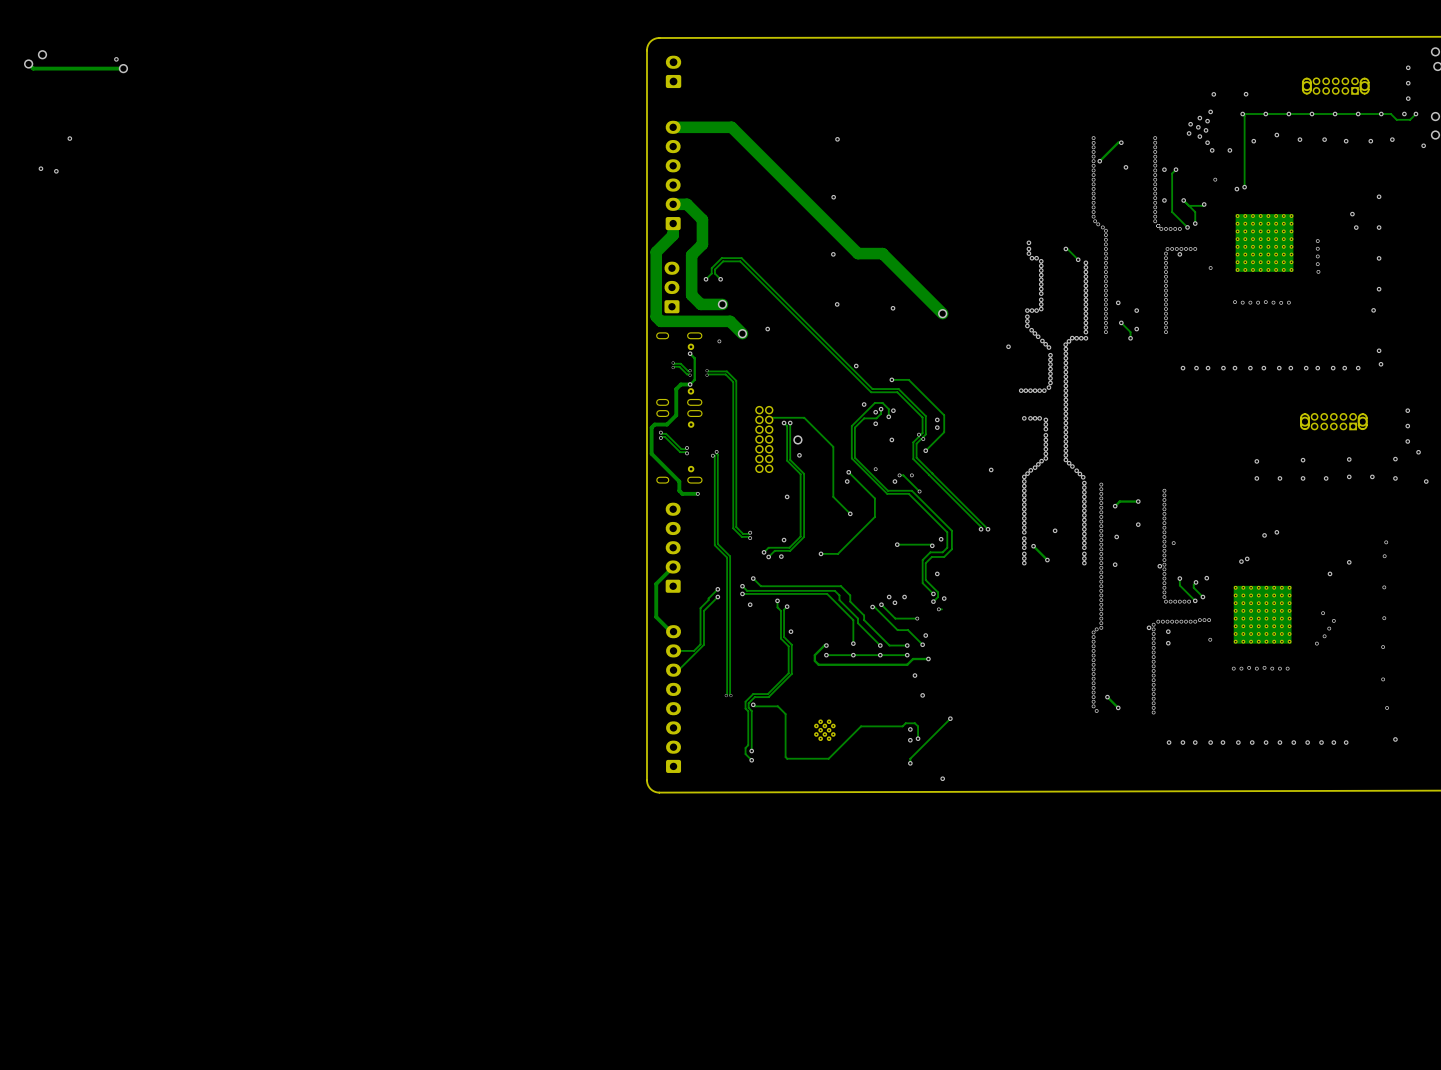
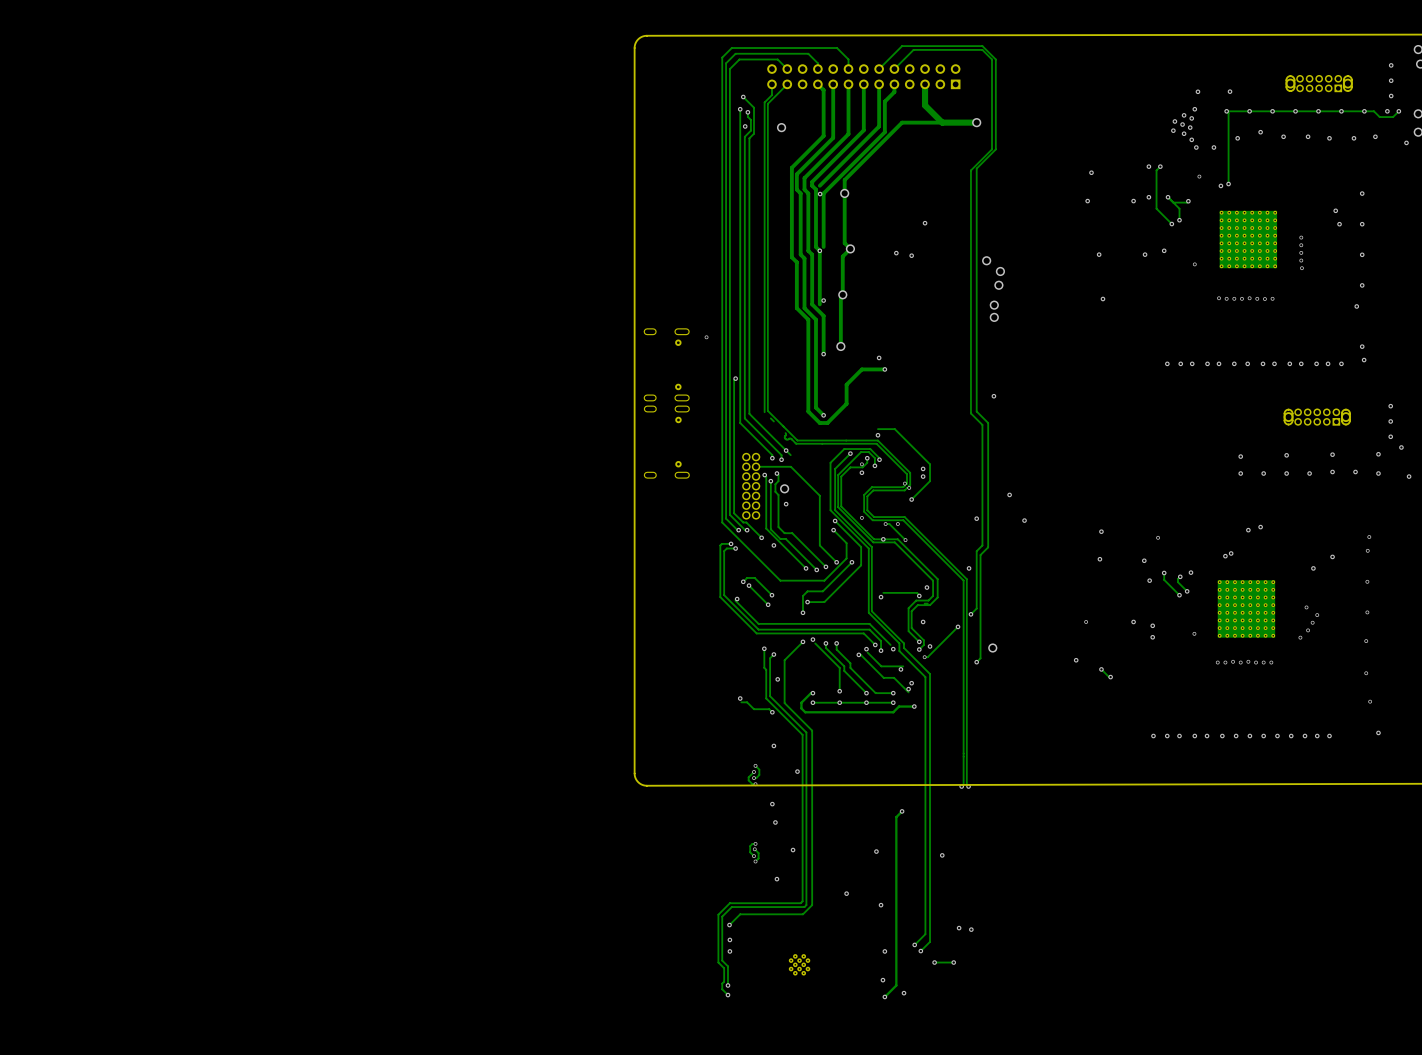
via: (42, 54) -> none
via: (116, 59) -> none
track: (28, 63) (33, 68) (123, 68) -> none
via: (28, 63) -> none
via: (123, 68) -> none
part: (673, 71) -> none
track: none -> (787, 69) (777, 59) (739, 59) (729, 69) (729, 514) (747, 530)
track: none -> (817, 69) (817, 63) (808, 53) (735, 53) (726, 63) (726, 518) (738, 530)
track: none -> (879, 69) (902, 46) (982, 46) (995, 59) (995, 149) (976, 168) (976, 411) (988, 423) (988, 547) (980, 555) (980, 658) (976, 662)
track: none -> (894, 69) (913, 49) (982, 49) (992, 59) (992, 149) (970, 170) (970, 413) (982, 424) (982, 545) (976, 551) (976, 608) (970, 614)
part: none -> (863, 76)
track: none -> (771, 84) (771, 95) (764, 102) (764, 412)
track: none -> (787, 84) (767, 103) (767, 410) (797, 440) (877, 440) (910, 472) (910, 484) (904, 490) (873, 490) (867, 496) (867, 510) (874, 517) (904, 517) (966, 579) (966, 784)
track: none -> (817, 84) (823, 90) (823, 136) (791, 167) (791, 257) (796, 262) (796, 308) (808, 319) (808, 411) (819, 423) (827, 423) (846, 403) (846, 384) (861, 369) (884, 369)
track: none -> (833, 84) (833, 137) (796, 174) (796, 189) (800, 193) (800, 254) (804, 258) (804, 308) (815, 319) (815, 407) (823, 415)
track: none -> (848, 84) (848, 134) (804, 178) (804, 189) (808, 193) (808, 250) (812, 254) (812, 304) (823, 315) (823, 354)
track: none -> (863, 84) (863, 130) (812, 181) (812, 185) (815, 189) (815, 246) (819, 250) (819, 304)
track: none -> (879, 84) (879, 126) (819, 185)
track: none -> (894, 84) (894, 92) (884, 101) (884, 132) (823, 193) (823, 246)
track: none -> (925, 84) (925, 105) (942, 122)
track: none -> (743, 96) (754, 107) (754, 133) (749, 138) (749, 413) (790, 455)
via: none -> (743, 96)
track: none -> (740, 109) (740, 423) (772, 455) (772, 458)
via: none -> (740, 109)
track: none -> (747, 112) (747, 116) (750, 119) (750, 130) (744, 136) (744, 418) (781, 455) (781, 459)
via: none -> (747, 112)
track: none -> (942, 122) (902, 122) (844, 180) (844, 243) (850, 248) (842, 256) (840, 346)
track: none -> (976, 122) (942, 122)
via: none -> (976, 122)
track: (673, 127) (731, 127) (857, 253) (882, 253) (942, 313) -> none
via: none -> (745, 126)
via: none -> (781, 127)
via: (69, 138) -> none
via: (1093, 138) -> none
via: (1155, 138) -> none
via: (837, 139) -> none
via: (1093, 142) -> none
track: (1121, 142) (1118, 142) (1099, 161) -> none
via: (1121, 142) -> none
via: (1155, 142) -> none
via: (1093, 147) -> none
via: (1155, 147) -> none
via: (1093, 151) -> none
via: (1155, 151) -> none
via: (1093, 156) -> none
via: (1155, 156) -> none
via: (1093, 161) -> none
via: (1099, 161) -> none
via: (1155, 161) -> none
via: (1093, 165) -> none
via: (1155, 165) -> none
via: (1125, 167) -> none
via: (40, 168) -> none
via: (1093, 170) -> none
via: (1155, 170) -> none
via: (56, 171) -> none
part: (673, 175) -> none
via: (1093, 175) -> none
via: none -> (1091, 172)
via: (1155, 175) -> none
via: (1093, 179) -> none
via: (1155, 179) -> none
via: (1093, 184) -> none
via: (1155, 184) -> none
via: (1093, 188) -> none
via: (1155, 188) -> none
via: (1093, 193) -> none
via: (1155, 193) -> none
via: none -> (844, 193)
via: (1093, 198) -> none
via: (1155, 198) -> none
via: (1093, 202) -> none
via: (1155, 202) -> none
track: (673, 204) (687, 204) (702, 219) (702, 244) (691, 255) (691, 295) (700, 304) (722, 304) -> none
via: none -> (1087, 201)
via: none -> (1133, 201)
via: (1093, 207) -> none
via: (1155, 207) -> none
via: (1093, 212) -> none
via: (1155, 212) -> none
via: (1093, 216) -> none
via: (1155, 216) -> none
via: (1095, 221) -> none
via: (1155, 221) -> none
track: (673, 223) (673, 235) (656, 252) (656, 316) (660, 321) (730, 321) (742, 333) -> none
via: (1098, 224) -> none
via: (1158, 225) -> none
via: none -> (925, 223)
via: (1102, 227) -> none
via: (1161, 228) -> none
via: (1165, 228) -> none
via: (1170, 228) -> none
via: (1175, 228) -> none
via: (1179, 228) -> none
via: (1105, 230) -> none
via: (1105, 235) -> none
via: (1105, 239) -> none
via: (1028, 242) -> none
via: (1105, 244) -> none
via: (1028, 248) -> none
track: (1065, 248) (1078, 259) -> none
via: (1065, 248) -> none
via: (1105, 248) -> none
via: (1167, 248) -> none
via: (1172, 248) -> none
via: (1176, 248) -> none
via: (1181, 248) -> none
via: (1186, 248) -> none
via: (1190, 248) -> none
via: (1195, 248) -> none
via: none -> (850, 248)
via: (1028, 253) -> none
via: (1105, 253) -> none
via: (1165, 253) -> none
via: none -> (896, 253)
via: (1032, 258) -> none
via: (1036, 258) -> none
via: (1106, 258) -> none
via: none -> (1099, 254)
via: none -> (1145, 254)
via: (1165, 258) -> none
via: none -> (911, 255)
via: (1078, 259) -> none
via: (1041, 261) -> none
via: (1085, 262) -> none
via: (1105, 262) -> none
via: (1165, 262) -> none
via: none -> (986, 260)
via: (1041, 265) -> none
via: (1085, 267) -> none
via: (1105, 267) -> none
via: (1165, 267) -> none
via: (1041, 270) -> none
via: (1085, 272) -> none
via: (1105, 272) -> none
via: (1165, 272) -> none
via: none -> (1000, 271)
via: (1041, 275) -> none
via: (1085, 276) -> none
via: (1105, 276) -> none
via: (1165, 276) -> none
track: (706, 279) (711, 273) (711, 268) (721, 258) (741, 258) (872, 389) (898, 389) (925, 416) (925, 434) (916, 443) (916, 457) (932, 473) -> none
via: (706, 279) -> none
track: (720, 279) (714, 273) (714, 269) (723, 261) (740, 261) (871, 392) (897, 392) (922, 417) (922, 433) (913, 442) (913, 459) (929, 474) -> none
via: (720, 279) -> none
via: (1041, 279) -> none
via: (1085, 281) -> none
via: (1105, 281) -> none
via: (1165, 281) -> none
via: (1041, 284) -> none
via: (1085, 285) -> none
via: (1105, 285) -> none
via: (1165, 285) -> none
part: (671, 287) -> none
via: none -> (998, 285)
via: (1041, 289) -> none
via: (1085, 290) -> none
via: (1105, 290) -> none
via: (1165, 290) -> none
via: (1041, 293) -> none
via: (1085, 295) -> none
via: (1105, 295) -> none
via: (1165, 295) -> none
via: none -> (842, 294)
via: (1041, 299) -> none
via: (1085, 299) -> none
via: (1105, 299) -> none
via: (1165, 299) -> none
via: (722, 304) -> none
via: (1041, 304) -> none
via: (1085, 304) -> none
via: (1105, 304) -> none
via: (1165, 304) -> none
via: (893, 308) -> none
via: none -> (994, 305)
via: (1041, 309) -> none
via: (1085, 309) -> none
via: (1105, 309) -> none
via: (1165, 309) -> none
via: (1027, 310) -> none
via: (1032, 310) -> none
via: (1036, 310) -> none
via: (1136, 310) -> none
via: (942, 313) -> none
via: (1085, 313) -> none
via: (1105, 313) -> none
via: (1165, 313) -> none
via: (1027, 316) -> none
via: (1085, 318) -> none
via: (1105, 318) -> none
via: (1165, 318) -> none
via: none -> (994, 317)
via: (1027, 321) -> none
via: (1085, 322) -> none
via: (1105, 322) -> none
track: (1121, 322) (1130, 332) (1130, 338) -> none
via: (1121, 322) -> none
via: (1165, 322) -> none
via: (1027, 325) -> none
via: (1085, 327) -> none
via: (1105, 327) -> none
via: (1165, 327) -> none
via: (767, 329) -> none
via: (1136, 329) -> none
via: (1031, 330) -> none
via: (1085, 332) -> none
via: (1105, 332) -> none
via: (1165, 332) -> none
via: (742, 333) -> none
via: (1034, 333) -> none
via: (1038, 336) -> none
via: (1072, 338) -> none
via: (1076, 338) -> none
via: (1081, 338) -> none
via: (1085, 338) -> none
via: (1130, 338) -> none
via: (1042, 341) -> none
via: (1068, 341) -> none
via: (1045, 344) -> none
via: (1065, 344) -> none
via: (1008, 346) -> none
via: (1048, 347) -> none
via: (1065, 349) -> none
via: none -> (840, 346)
track: (690, 353) (694, 358) (694, 379) (690, 384) (680, 384) (676, 389) (676, 415) (667, 424) (654, 424) (651, 427) (651, 453) (679, 481) (679, 490) (682, 493) (697, 493) -> none
via: (690, 353) -> none
via: (1065, 353) -> none
via: (1050, 355) -> none
via: none -> (823, 354)
via: (1065, 358) -> none
via: (1050, 359) -> none
track: (673, 362) (680, 363) (688, 371) (690, 370) -> none
via: (673, 362) -> none
via: none -> (879, 357)
via: (1065, 362) -> none
via: (1050, 364) -> none
via: (856, 366) -> none
track: (673, 367) (679, 366) (690, 375) -> none
via: (673, 367) -> none
via: (1065, 367) -> none
via: (1050, 369) -> none
via: (690, 370) -> none
track: (707, 370) (726, 371) (736, 380) (736, 527) (743, 533) (750, 532) -> none
via: (707, 370) -> none
via: (1065, 372) -> none
via: none -> (884, 369)
via: (1050, 373) -> none
via: (690, 375) -> none
track: (707, 375) (725, 374) (733, 382) (733, 528) (741, 536) (750, 538) -> none
via: (707, 375) -> none
via: (1065, 376) -> none
via: (1050, 378) -> none
track: (891, 379) (908, 379) (944, 415) (944, 432) (925, 450) -> (877, 429) (894, 429) (930, 464) (930, 481) (911, 499)
via: (891, 379) -> none
via: (1065, 381) -> none
track: none -> (735, 378) (734, 380) (734, 513) (761, 537)
via: none -> (735, 378)
via: (1050, 382) -> none
via: (690, 384) -> none
via: (1065, 386) -> none
via: (1048, 387) -> none
via: (1021, 390) -> none
via: (1025, 390) -> none
via: (1030, 390) -> none
via: (1035, 390) -> none
via: (1039, 390) -> none
via: (1044, 390) -> none
via: (1065, 390) -> none
via: (1065, 395) -> none
via: (1065, 399) -> none
via: none -> (993, 396)
via: (864, 404) -> none
via: (1065, 404) -> none
track: (881, 409) (881, 413) (876, 418) (864, 418) (854, 427) (854, 457) (887, 490) (911, 490) (951, 530) (951, 549) (944, 556) (931, 556) (925, 563) (925, 580) (938, 592) (938, 597) (933, 601) -> none
via: (881, 409) -> none
via: (1065, 409) -> none
via: (893, 410) -> none
via: (875, 412) -> none
via: (1065, 413) -> none
track: (888, 416) (888, 409) (882, 402) (874, 402) (851, 426) (851, 458) (887, 493) (908, 493) (947, 532) (947, 547) (942, 552) (930, 552) (922, 560) (922, 583) (933, 593) -> (874, 465) (874, 458) (868, 452) (861, 452) (838, 475) (838, 507) (873, 542) (894, 542) (933, 580) (933, 595) (928, 600) (916, 600) (908, 608) (908, 631) (919, 641)
via: (888, 416) -> none
track: (769, 417) (804, 417) (833, 446) (833, 496) (850, 513) -> (756, 466) (790, 466) (819, 495) (819, 545) (836, 562)
via: (1024, 418) -> none
via: (1030, 418) -> none
via: (1035, 418) -> none
via: (1039, 418) -> none
via: (1065, 418) -> none
via: none -> (823, 415)
via: (937, 419) -> none
via: (1045, 419) -> none
via: (784, 423) -> none
track: (790, 423) (790, 459) (804, 473) (804, 536) (790, 550) (774, 550) (768, 556) -> none
via: (790, 423) -> none
via: (875, 423) -> none
via: (1065, 423) -> none
via: (1045, 424) -> none
track: (787, 426) (787, 460) (800, 474) (800, 536) (789, 547) (768, 547) (764, 552) -> none
via: (937, 427) -> none
via: (1065, 427) -> none
via: (1045, 429) -> none
track: (660, 432) (666, 433) (681, 449) (687, 447) -> none
via: (660, 432) -> none
via: (1065, 432) -> none
via: (918, 434) -> none
via: (1045, 435) -> none
via: (1065, 436) -> none
track: none -> (785, 433) (785, 439) (790, 438) (796, 443) (876, 443) (906, 474) (906, 483)
track: (660, 438) (664, 436) (680, 452) (687, 453) -> none
via: (660, 438) -> none
part position: (764, 439) -> (751, 486)
via: (797, 439) -> none
via: (923, 439) -> none
via: (1045, 439) -> none
via: (1065, 441) -> none
via: (1045, 444) -> none
via: (1065, 446) -> none
via: (687, 447) -> none
via: (1045, 449) -> none
via: (925, 450) -> none
via: (1065, 450) -> none
track: (716, 451) (717, 544) (730, 556) (730, 695) -> none
via: (716, 451) -> none
via: (687, 453) -> none
via: (1045, 453) -> none
track: (712, 455) (714, 455) (714, 545) (727, 557) (726, 695) -> none
via: (712, 455) -> none
via: (1065, 455) -> none
track: none -> (850, 453) (835, 468) (835, 510) (871, 546) (871, 611) (904, 643) (904, 648) (930, 674) (930, 941) (920, 951)
via: none -> (850, 453)
via: (1045, 458) -> none
via: (1065, 459) -> none
via: (1041, 461) -> none
via: none -> (772, 458)
track: none -> (867, 458) (867, 462) (862, 467) (850, 467) (841, 476) (841, 506) (874, 539) (883, 539)
via: none -> (867, 458)
via: (1069, 463) -> none
via: none -> (781, 459)
track: none -> (879, 459) (870, 449) (844, 449) (830, 462) (830, 510) (868, 548) (868, 612) (899, 643) (899, 651) (925, 677) (925, 934) (914, 944)
via: none -> (879, 459)
via: (1038, 464) -> none
via: (1072, 466) -> none
via: (1035, 467) -> none
via: (991, 469) -> none
via: none -> (874, 465)
via: (1030, 470) -> none
via: (1076, 470) -> none
track: (848, 472) (874, 498) (874, 516) (837, 553) (821, 553) -> (835, 520) (861, 546) (861, 565) (824, 602) (807, 602)
via: (848, 472) -> none
track: (932, 473) (987, 529) -> none
via: none -> (923, 468)
via: (1027, 473) -> none
via: (1079, 474) -> none
track: (899, 475) (903, 475) (919, 491) -> (885, 524) (889, 524) (905, 540)
via: (899, 475) -> none
via: (911, 475) -> none
track: (929, 475) (981, 526) (981, 529) -> none
via: (1024, 476) -> none
via: none -> (861, 472)
via: (1083, 477) -> none
track: none -> (776, 473) (778, 481) (775, 484) (775, 491) (778, 494) (778, 527) (784, 533) (792, 533) (825, 566)
via: none -> (776, 473)
track: none -> (764, 475) (766, 528) (806, 568)
via: none -> (764, 475)
via: (847, 481) -> none
via: (894, 481) -> none
via: none -> (923, 476)
via: (1024, 481) -> none
via: (1084, 483) -> none
via: (1101, 484) -> none
track: none -> (770, 481) (770, 529) (780, 538) (785, 538) (816, 569)
via: none -> (770, 481)
via: (1024, 486) -> none
via: (1084, 487) -> none
via: none -> (904, 483)
track: none -> (906, 483) (903, 487) (871, 487) (864, 495) (864, 511) (872, 520) (903, 520) (963, 580) (963, 784)
via: (1101, 489) -> none
via: (1024, 490) -> none
via: (1164, 490) -> none
via: (919, 491) -> none
via: none -> (909, 487)
via: (1084, 492) -> none
via: (697, 493) -> none
via: none -> (784, 488)
via: (1101, 493) -> none
via: (1024, 495) -> none
via: (1164, 495) -> none
via: (787, 496) -> none
via: (1084, 496) -> none
via: (1101, 498) -> none
via: (1164, 500) -> none
via: (1084, 501) -> none
track: (1138, 501) (1119, 501) (1115, 506) -> none
via: (1138, 501) -> none
via: (1101, 503) -> none
via: none -> (911, 499)
via: (1024, 504) -> none
via: (1164, 504) -> none
via: (1084, 506) -> none
via: (1115, 506) -> none
via: (1101, 507) -> none
via: none -> (786, 504)
via: (1024, 509) -> none
via: (1164, 509) -> none
via: (1084, 510) -> none
via: (1101, 512) -> none
via: (850, 513) -> none
via: (1024, 513) -> none
via: (1164, 513) -> none
via: (1084, 515) -> none
via: (1101, 516) -> none
via: (1024, 518) -> none
via: (1164, 518) -> none
via: (1084, 520) -> none
via: (1101, 521) -> none
via: none -> (861, 517)
via: none -> (976, 518)
via: (1024, 523) -> none
via: (1164, 523) -> none
via: (1084, 524) -> none
via: (1138, 524) -> none
via: none -> (1024, 520)
via: none -> (835, 520)
via: (1101, 526) -> none
via: (1024, 527) -> none
via: (1164, 527) -> none
via: none -> (885, 524)
via: none -> (897, 524)
via: (981, 529) -> none
via: (987, 529) -> none
via: (1084, 529) -> none
via: (1055, 530) -> none
via: (1101, 530) -> none
via: (750, 532) -> none
via: (1024, 532) -> none
via: (1164, 532) -> none
via: (1084, 533) -> none
via: none -> (738, 530)
via: none -> (747, 530)
via: none -> (833, 530)
via: (1101, 535) -> none
via: (1164, 536) -> none
via: (750, 538) -> none
via: (1024, 538) -> none
via: (1084, 538) -> none
via: (941, 539) -> none
via: (784, 540) -> none
via: (1101, 540) -> none
via: (1164, 541) -> none
via: none -> (761, 537)
via: (1024, 543) -> none
via: (1084, 543) -> none
track: (911, 544) (932, 545) -> (897, 539) (937, 579) (937, 597) (930, 605) (917, 605) (911, 611) (911, 628) (923, 640) (923, 644) (919, 649)
via: (1101, 544) -> none
via: none -> (905, 540)
via: (932, 545) -> none
track: (1033, 546) (1047, 560) -> none
via: (1033, 546) -> none
via: (1164, 546) -> none
part: (673, 547) -> none
via: (1024, 547) -> none
via: (1084, 547) -> none
track: none -> (731, 543) (720, 545) (720, 597) (756, 633) (863, 633) (875, 644)
via: none -> (731, 543)
via: (1101, 549) -> none
via: none -> (773, 545)
via: (1164, 550) -> none
via: (764, 552) -> none
track: none -> (735, 548) (726, 548) (724, 551) (724, 595) (758, 629) (869, 629) (881, 641) (881, 650)
via: none -> (735, 548)
via: (821, 553) -> none
via: (1024, 553) -> none
via: (1084, 553) -> none
via: (1101, 553) -> none
via: (1164, 555) -> none
via: (768, 556) -> none
via: (781, 556) -> none
via: (1024, 558) -> none
via: (1084, 558) -> none
via: (1101, 558) -> none
via: (1047, 560) -> none
via: (1164, 560) -> none
via: (1024, 563) -> none
via: (1084, 563) -> none
via: (1101, 563) -> none
via: (1164, 564) -> none
track: (673, 566) (656, 583) (656, 617) (670, 631) (673, 631) -> none
via: none -> (836, 562)
track: none -> (851, 562) (822, 591) (807, 591) (802, 595) (802, 612)
via: none -> (851, 562)
via: (1101, 567) -> none
via: (1164, 569) -> none
via: none -> (825, 566)
via: (1101, 572) -> none
via: none -> (806, 568)
via: (937, 573) -> none
via: none -> (969, 568)
via: (1164, 573) -> none
via: none -> (816, 569)
via: (1101, 577) -> none
track: (753, 578) (760, 586) (793, 586) -> (848, 69) (848, 59) (837, 48) (731, 48) (722, 57) (722, 522) (780, 580)
via: (753, 578) -> none
via: (1164, 578) -> none
via: (1101, 581) -> none
via: (1164, 583) -> none
track: (742, 586) (747, 590) (834, 590) (839, 595) (839, 600) (857, 618) (857, 623) (880, 645) -> none
via: (742, 586) -> none
track: (837, 586) (841, 586) (850, 595) (850, 601) (864, 615) (864, 620) (889, 645) (907, 645) -> (824, 580) (846, 558) (846, 543) (833, 530)
via: (1101, 586) -> none
via: none -> (1149, 580)
track: none -> (743, 581) (747, 577) (754, 577) (771, 595)
via: none -> (743, 581)
via: (1164, 587) -> none
track: (717, 589) (700, 608) (700, 644) (694, 650) (673, 650) -> none
via: (717, 589) -> none
via: (1101, 590) -> none
track: none -> (749, 585) (768, 604)
via: none -> (749, 585)
via: (1164, 592) -> none
track: (742, 593) (827, 593) (853, 620) (853, 643) -> none
via: (742, 593) -> none
via: (933, 593) -> none
via: none -> (926, 587)
via: (1101, 595) -> none
track: (717, 597) (703, 610) (703, 644) (678, 670) -> none
via: (717, 597) -> none
via: (889, 597) -> none
via: (904, 597) -> none
via: (1164, 597) -> none
track: none -> (883, 592) (918, 594)
via: (944, 598) -> none
track: (777, 600) (777, 607) (780, 610) (780, 638) (788, 646) (788, 673) (767, 694) (753, 694) (745, 701) (745, 708) (748, 711) (748, 745) (745, 747) (745, 754) (751, 760) -> none
via: (777, 600) -> none
via: none -> (771, 595)
via: (1101, 600) -> none
via: (1165, 601) -> none
via: (1170, 601) -> none
via: (1175, 601) -> none
via: (1179, 601) -> none
via: (1184, 601) -> none
via: (1189, 601) -> none
track: none -> (735, 599) (758, 623) (869, 623) (890, 644)
track: (881, 604) (895, 618) (917, 618) -> (867, 652) (881, 666) (903, 666)
via: (881, 604) -> none
via: (1101, 604) -> none
track: (787, 606) (784, 609) (784, 637) (791, 644) (791, 674) (768, 697) (754, 697) (748, 703) (748, 707) (751, 710) (751, 751) -> none
via: (787, 606) -> none
via: none -> (807, 602)
track: (872, 607) (897, 630) (908, 630) (922, 644) -> (858, 654) (883, 677) (894, 677) (908, 692)
via: (872, 607) -> none
via: (938, 609) -> none
via: (1101, 609) -> none
via: none -> (768, 604)
via: (1101, 613) -> none
via: none -> (802, 612)
via: (917, 618) -> none
via: (1101, 618) -> none
via: none -> (970, 614)
via: (1199, 620) -> none
via: (1204, 620) -> none
via: (1209, 620) -> none
via: (1158, 621) -> none
via: (1162, 621) -> none
via: (1167, 621) -> none
via: (1172, 621) -> none
via: (1176, 621) -> none
via: (1181, 621) -> none
via: (1186, 621) -> none
via: (1190, 621) -> none
via: (1195, 621) -> none
via: (1101, 623) -> none
via: (1153, 624) -> none
via: none -> (923, 621)
via: (1096, 629) -> none
via: (1153, 629) -> none
via: (790, 631) -> none
track: none -> (958, 626) (927, 657) (924, 657)
via: none -> (958, 626)
via: (1093, 632) -> none
via: (1153, 633) -> none
via: (925, 635) -> none
via: (1093, 637) -> none
via: (1153, 638) -> none
via: (1093, 641) -> none
via: (853, 643) -> none
via: (1153, 643) -> none
via: (922, 644) -> none
track: (826, 645) (814, 655) (814, 660) (818, 664) (907, 664) (913, 659) (928, 659) -> (812, 693) (801, 702) (801, 708) (805, 712) (893, 712) (899, 706) (914, 706)
via: (880, 645) -> none
via: (907, 645) -> none
via: (1093, 646) -> none
track: none -> (802, 641) (784, 660) (784, 703) (812, 730) (812, 905) (802, 914) (740, 914) (729, 925)
via: none -> (802, 641)
via: none -> (919, 641)
via: (1153, 647) -> none
track: none -> (815, 643) (839, 667) (839, 691)
track: none -> (825, 643) (825, 648) (844, 666) (844, 670) (866, 693)
via: none -> (825, 643)
track: none -> (836, 643) (836, 649) (850, 663) (850, 667) (875, 693) (893, 693)
via: none -> (836, 643)
via: none -> (875, 644)
via: (1093, 650) -> none
via: none -> (930, 646)
via: (1153, 652) -> none
track: none -> (764, 648) (766, 698) (802, 734) (802, 901) (800, 903) (729, 903) (718, 914) (718, 962) (724, 968) (722, 989) (727, 995)
via: none -> (764, 648)
via: none -> (992, 648)
via: (826, 655) -> none
via: (853, 655) -> none
track: (907, 655) (826, 655) -> (893, 702) (812, 702)
via: none -> (919, 649)
via: (1093, 655) -> none
via: none -> (881, 650)
via: (1153, 657) -> none
via: (928, 659) -> none
track: none -> (773, 654) (770, 658) (770, 696) (806, 732) (806, 905) (804, 907) (731, 907) (722, 916) (722, 960) (727, 966) (727, 985)
via: none -> (773, 654)
via: none -> (858, 654)
via: (1093, 660) -> none
via: (1153, 661) -> none
via: none -> (924, 657)
via: (1093, 664) -> none
via: none -> (1076, 660)
via: (1153, 666) -> none
via: none -> (976, 662)
via: (1093, 669) -> none
via: (1153, 670) -> none
via: (1093, 674) -> none
track: none -> (1101, 669) (1110, 677)
via: none -> (1101, 669)
via: (1153, 675) -> none
via: (1093, 678) -> none
via: (1153, 680) -> none
via: (1093, 683) -> none
via: none -> (1110, 677)
via: (1153, 684) -> none
via: none -> (777, 679)
via: (1093, 687) -> none
via: none -> (911, 683)
via: (1153, 689) -> none
via: (1093, 692) -> none
via: (1153, 694) -> none
via: (726, 695) -> none
via: (730, 695) -> none
via: none -> (839, 691)
via: (1093, 697) -> none
track: (1107, 697) (1118, 707) -> none
via: (1107, 697) -> none
via: (1153, 698) -> none
part: (673, 699) -> none
via: none -> (812, 693)
via: none -> (866, 693)
via: none -> (893, 693)
via: (1093, 701) -> none
via: (1153, 703) -> none
track: (753, 704) (777, 706) (785, 714) (787, 758) (828, 758) (861, 726) (902, 726) (905, 723) (914, 723) (918, 726) (918, 738) -> none
via: (1093, 706) -> none
via: (1118, 707) -> none
via: (1153, 707) -> none
track: none -> (741, 702) (747, 702) (754, 709) (769, 709) (772, 712)
via: none -> (812, 702)
via: none -> (839, 702)
via: none -> (866, 702)
via: none -> (893, 702)
via: (1096, 710) -> none
via: none -> (914, 706)
via: (1153, 712) -> none
via: none -> (772, 712)
track: (950, 718) (910, 758) (910, 763) -> none
via: (950, 718) -> none
via: (910, 729) -> none
part: (824, 730) -> none
via: (918, 738) -> none
via: (910, 740) -> none
via: (751, 751) -> none
via: none -> (773, 745)
via: (751, 760) -> none
via: (910, 763) -> none
track: none -> (755, 765) (759, 769) (759, 775) (754, 778)
via: none -> (755, 765)
track: none -> (754, 771) (748, 777) (748, 780) (755, 784)
via: none -> (754, 771)
via: none -> (797, 771)
via: (942, 778) -> none
via: none -> (754, 778)
via: none -> (755, 784)
via: none -> (961, 786)
via: none -> (968, 786)
via: none -> (772, 804)
track: none -> (902, 811) (896, 817) (896, 985) (884, 996)
via: none -> (902, 811)
via: none -> (775, 822)
track: none -> (755, 843) (750, 846) (750, 852) (754, 856)
via: none -> (755, 843)
track: none -> (754, 849) (758, 853) (758, 858) (755, 861)
via: none -> (754, 849)
via: none -> (793, 850)
via: none -> (876, 851)
via: none -> (942, 855)
via: none -> (754, 856)
via: none -> (755, 861)
via: none -> (776, 879)
via: none -> (846, 893)
via: none -> (881, 905)
via: none -> (729, 925)
via: none -> (959, 928)
via: none -> (971, 929)
via: none -> (729, 939)
via: none -> (914, 944)
via: none -> (920, 951)
via: none -> (729, 951)
via: none -> (884, 951)
via: none -> (934, 962)
track: none -> (953, 962) (934, 962)
via: none -> (953, 962)
part: none -> (799, 964)
via: none -> (882, 980)
via: none -> (727, 985)
via: none -> (904, 993)
via: none -> (727, 995)
via: none -> (884, 996)

